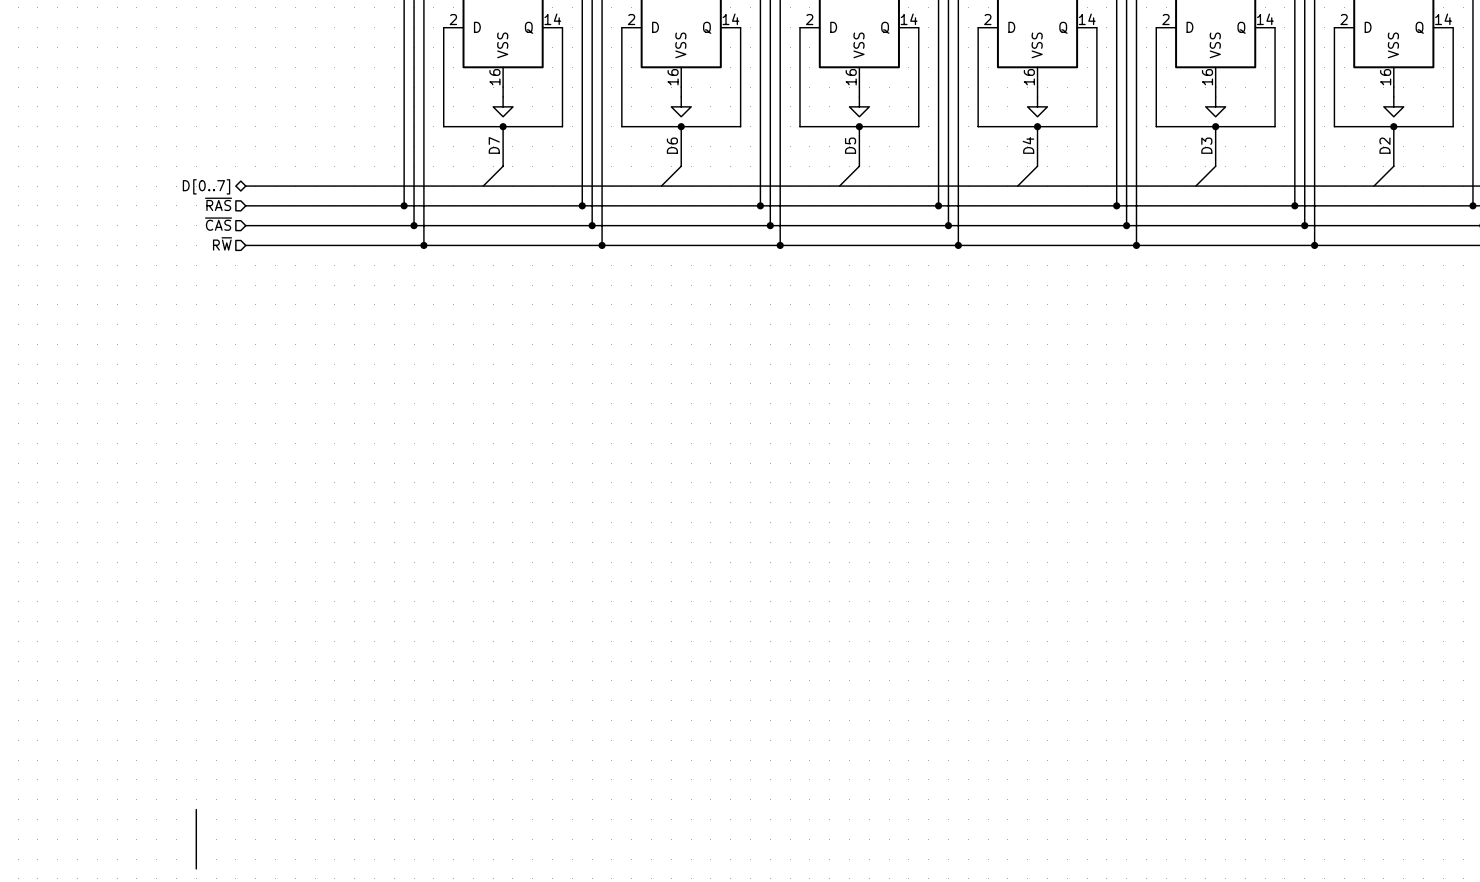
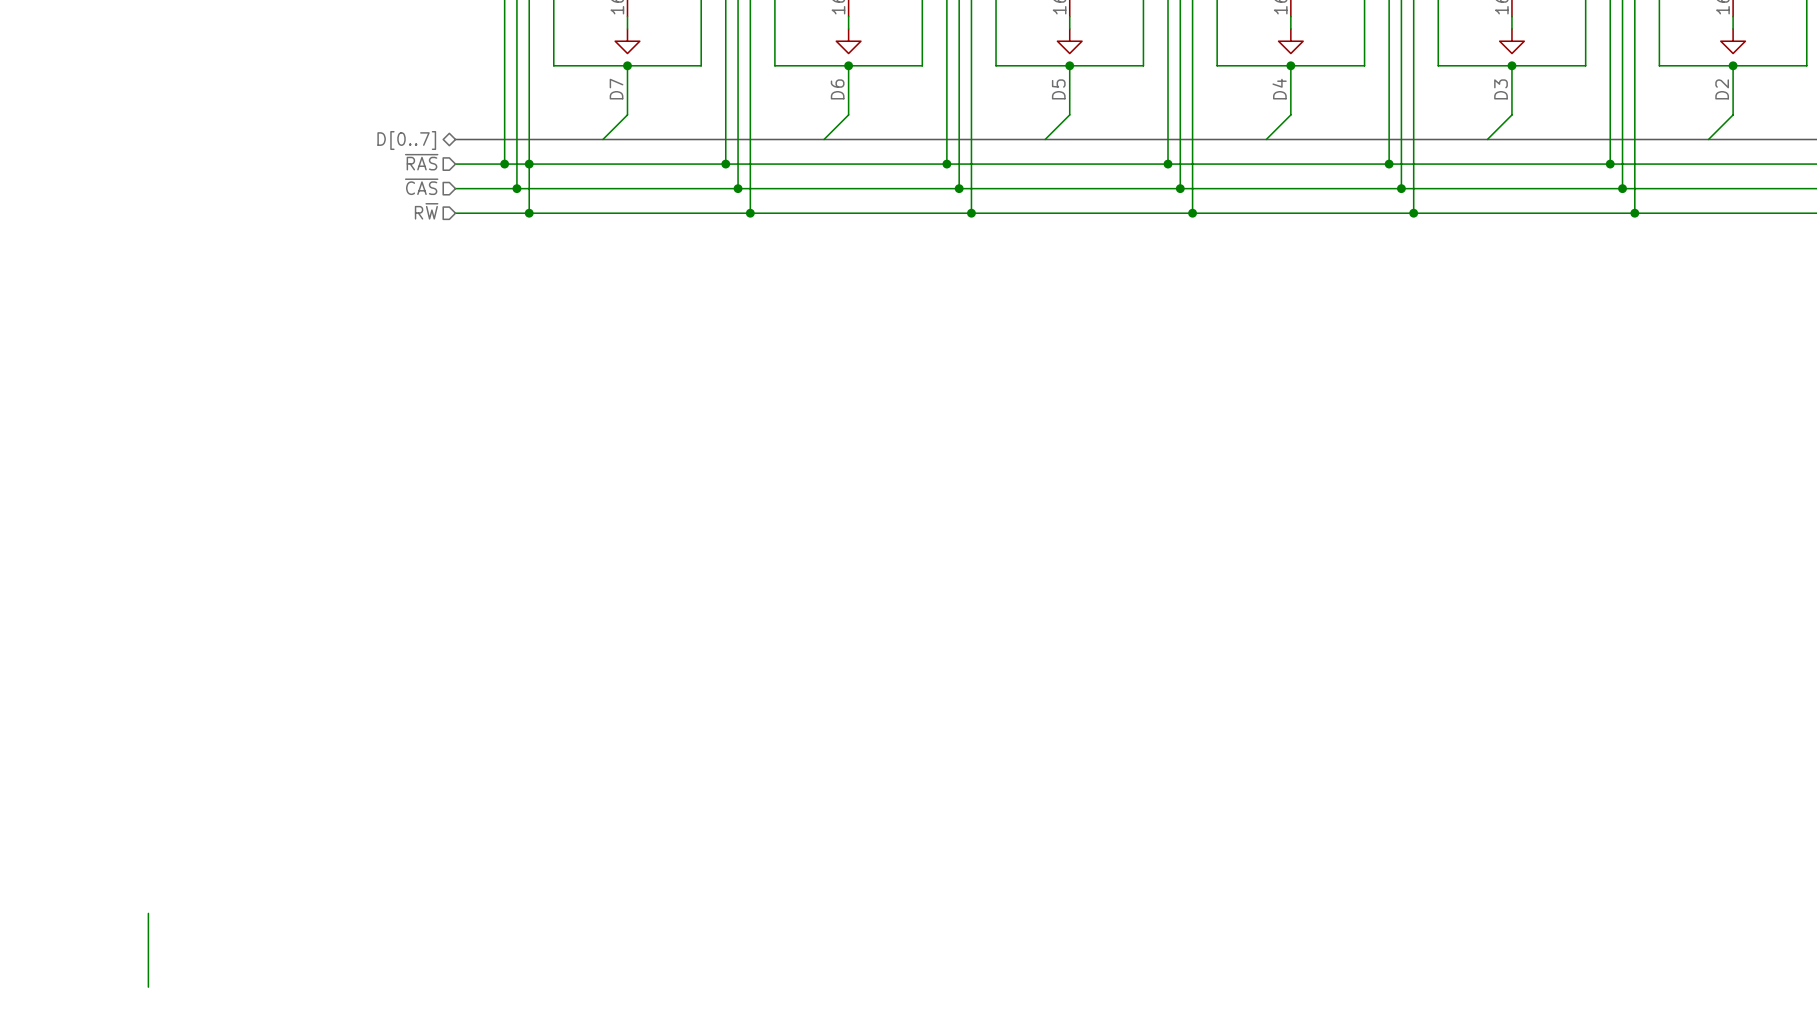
hierarchical label position: D[0..7] (206, 186) -> D[0..7] (406, 140)
bus: (245, 186) (364, 186) -> none
hierarchical label position: ~{RAS} (218, 204) -> ~{RAS} (421, 162)
wire: (245, 205) (364, 205) -> none
junction: none -> (529, 164)
hierarchical label position: ~{CAS} (218, 224) -> ~{CAS} (421, 186)
wire: (245, 225) (364, 225) -> none
hierarchical label position: R~{W} (222, 243) -> R~{W} (426, 211)
wire: (245, 245) (364, 245) -> none
wire: (196, 809) (196, 868) -> (148, 913) (148, 987)

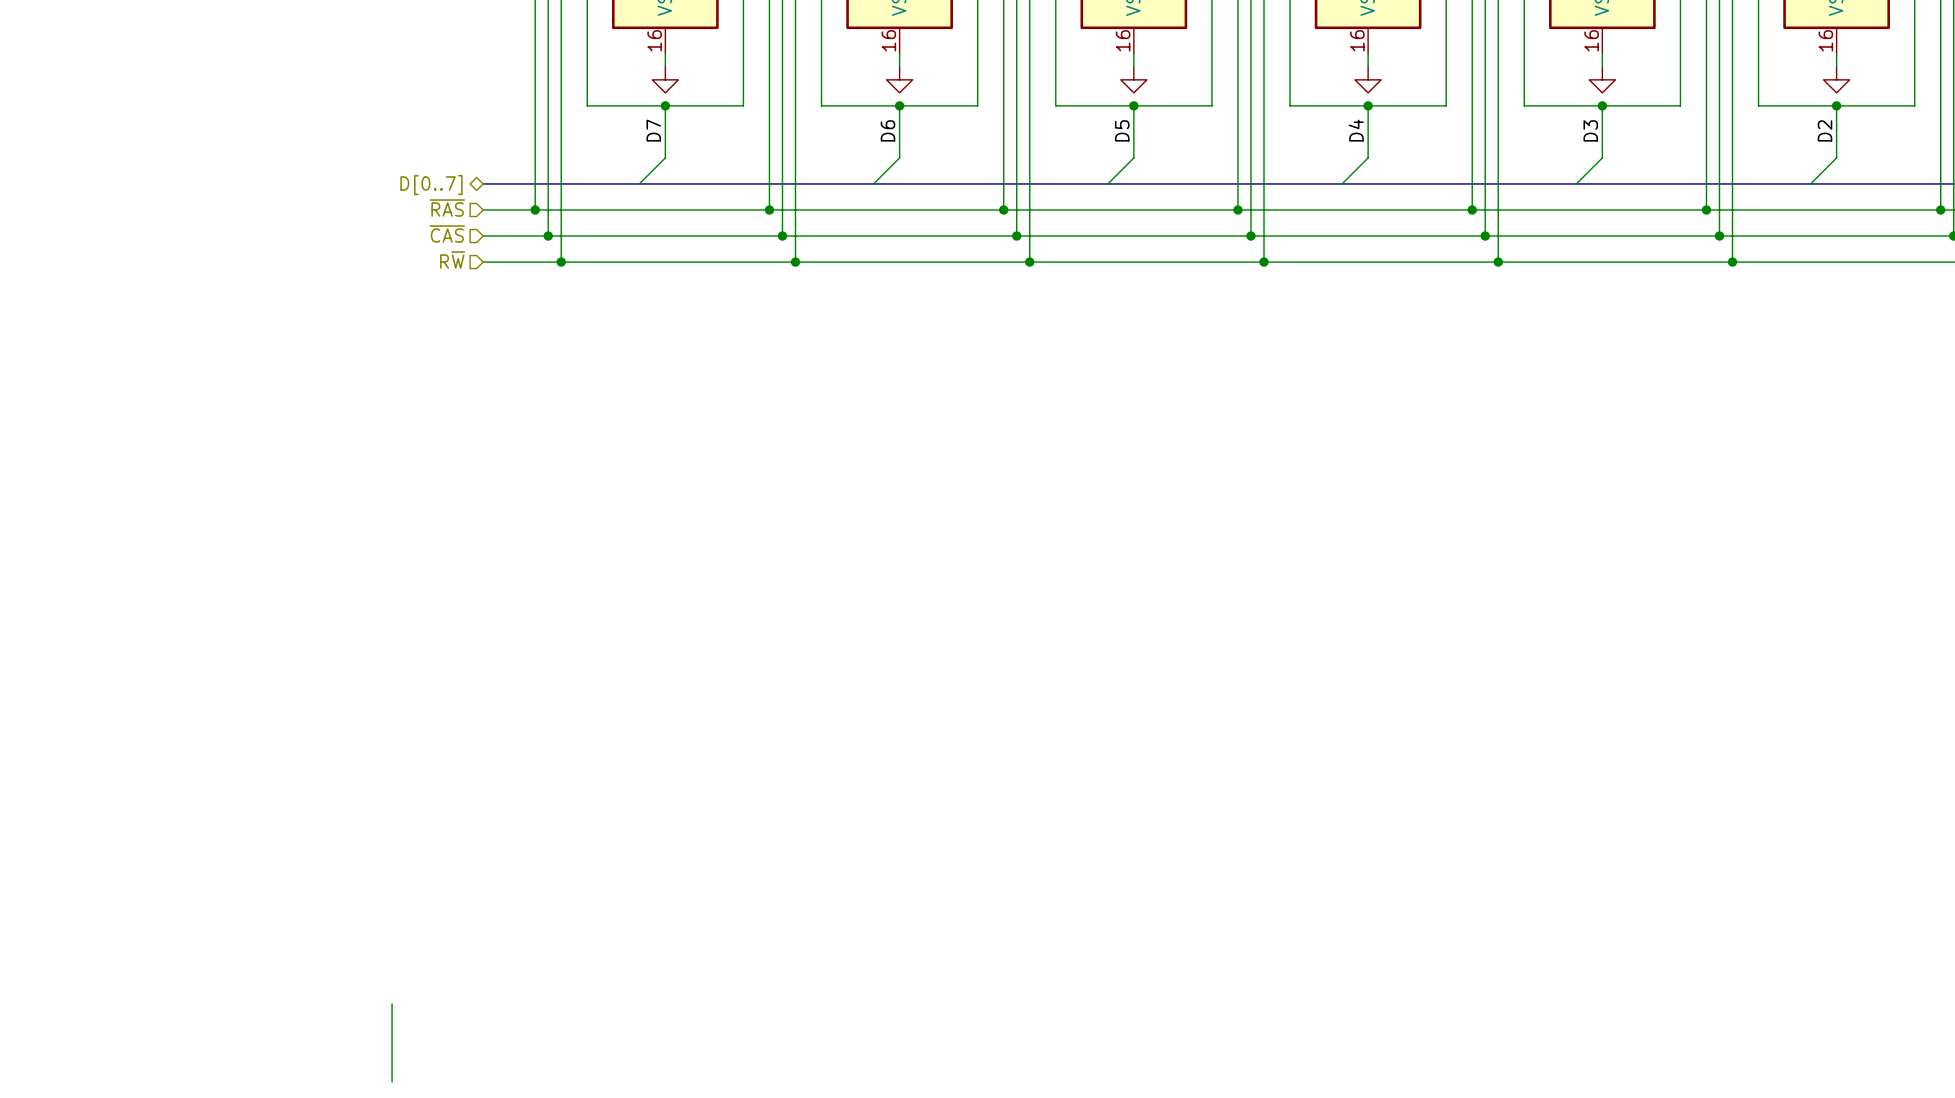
junction: (529, 164) -> none
wire: (148, 913) (148, 987) -> (392, 1003) (392, 1081)

